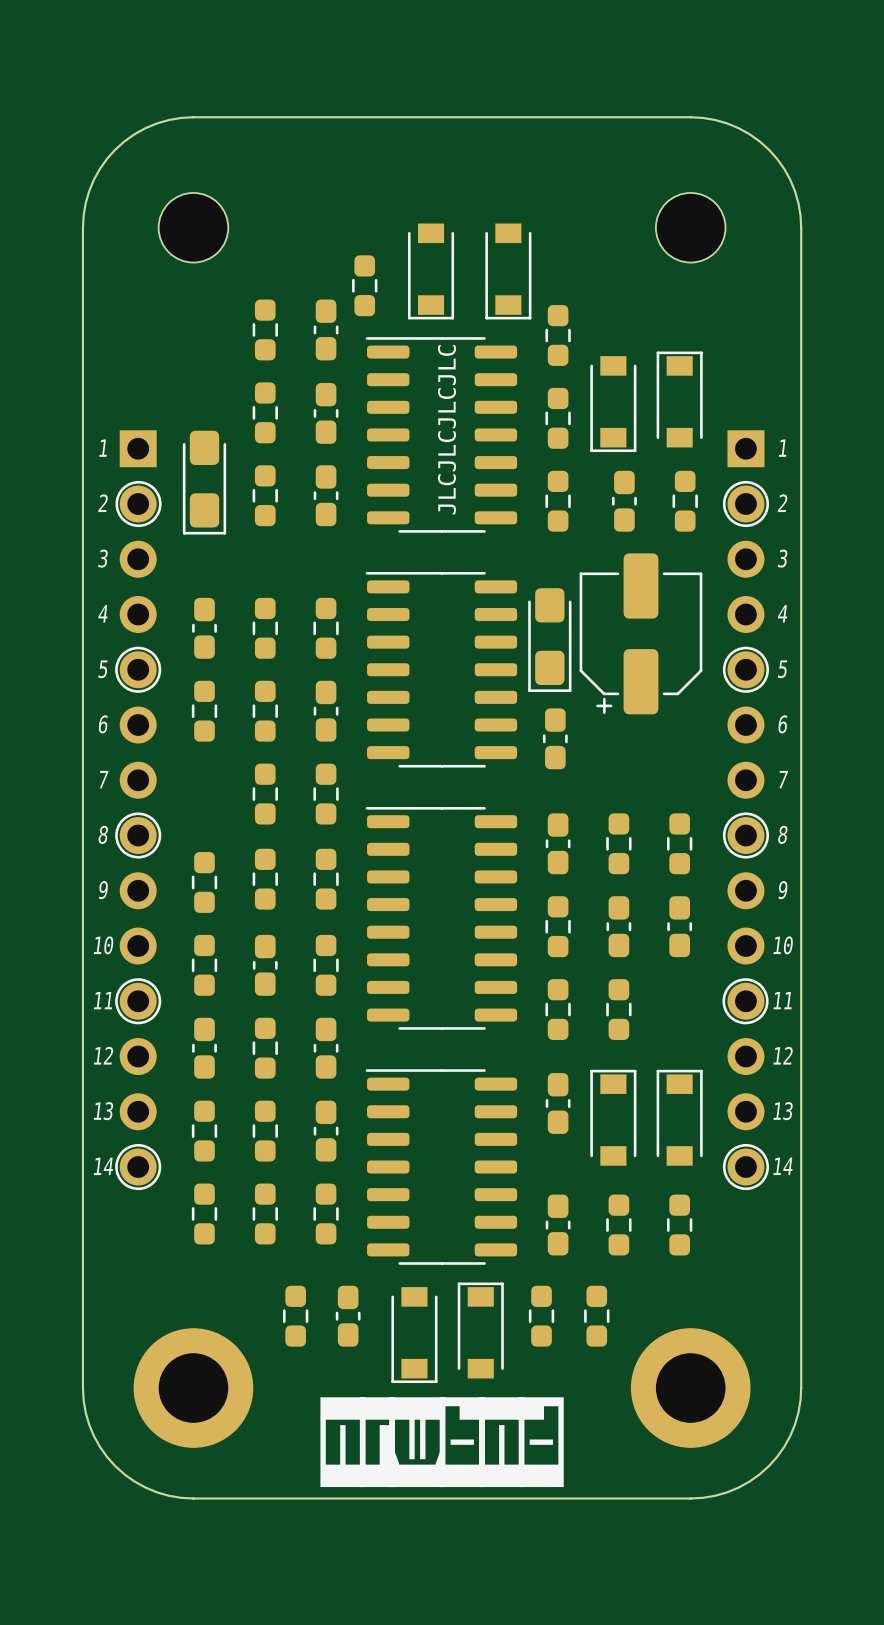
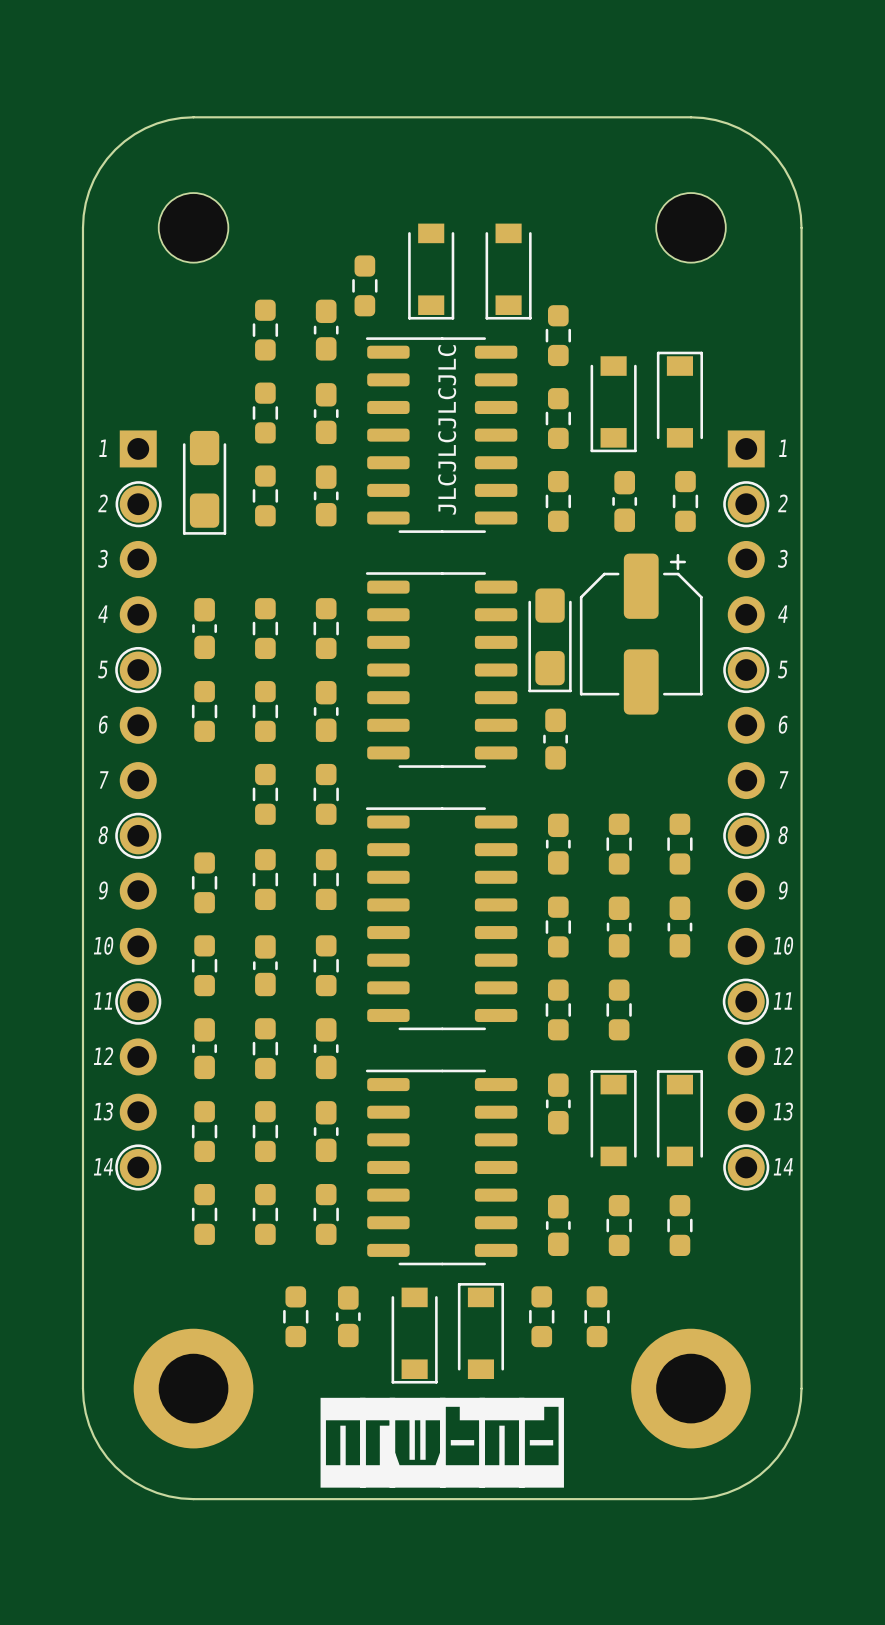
part rotation: 0° (640, 633) -> 180° (641, 634)

